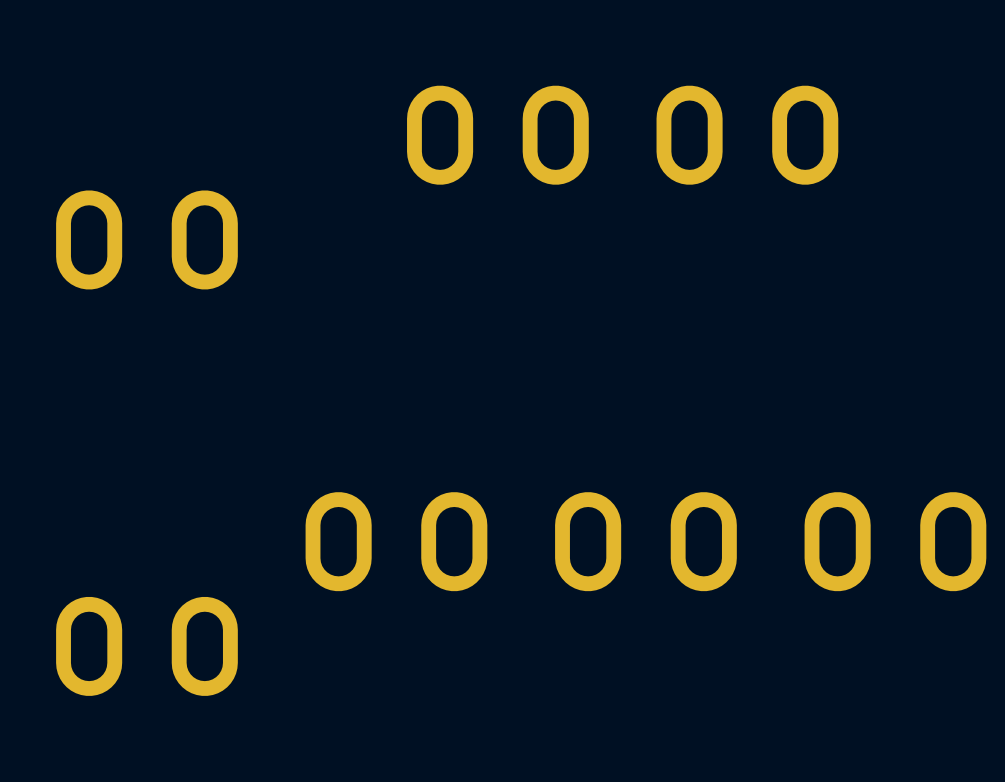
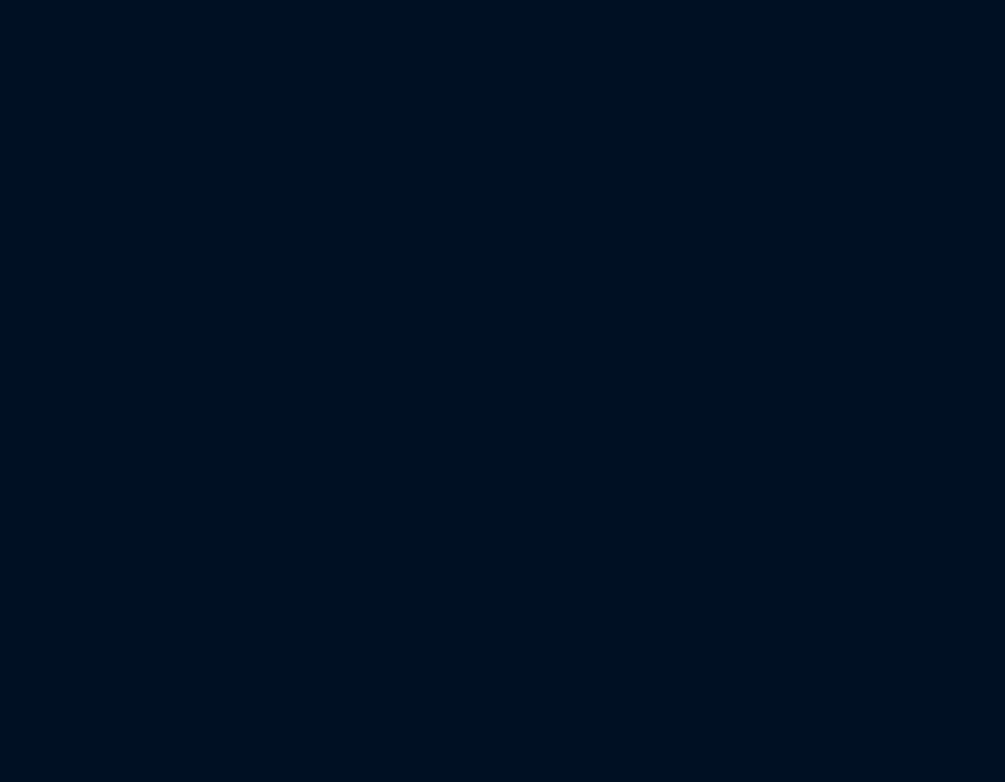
part: (497, 135) -> none
part: (747, 135) -> none
part: (146, 239) -> none
part: (396, 541) -> none
part: (645, 541) -> none
part: (895, 541) -> none
part: (146, 646) -> none

